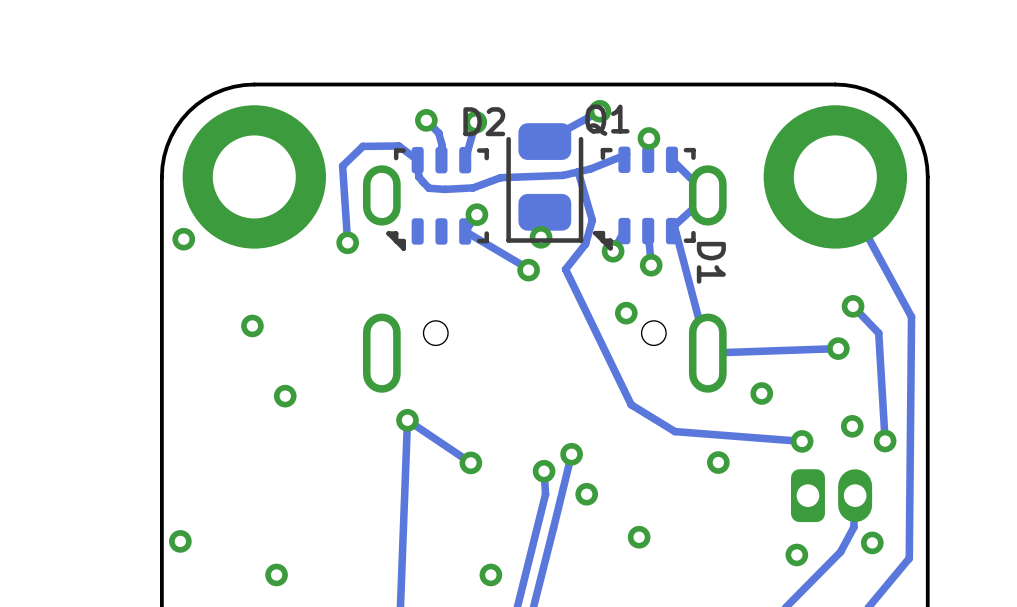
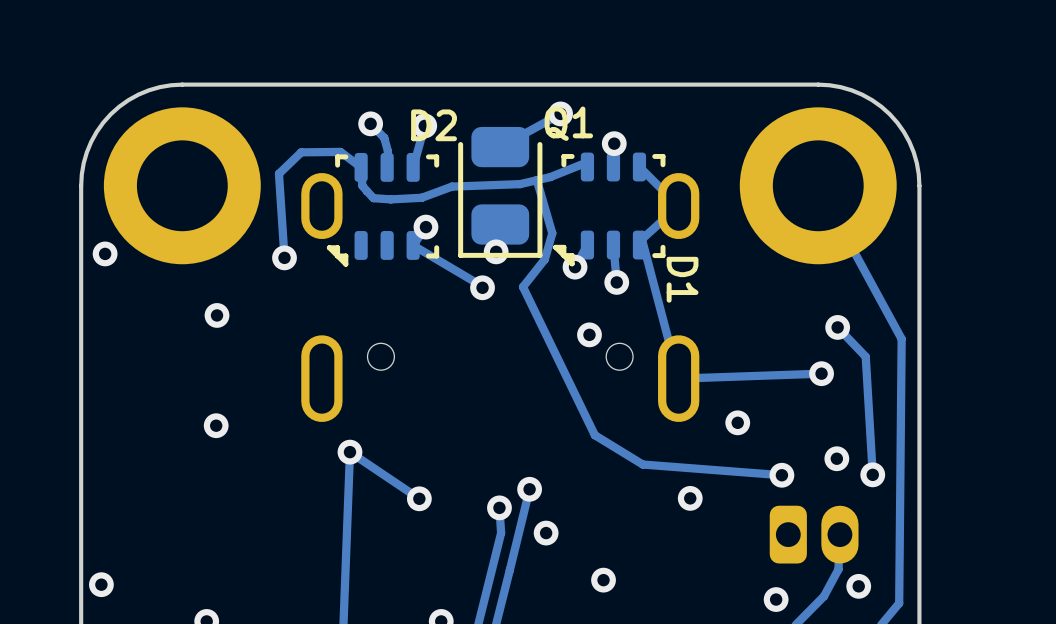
via position: (252, 325) -> (217, 315)

